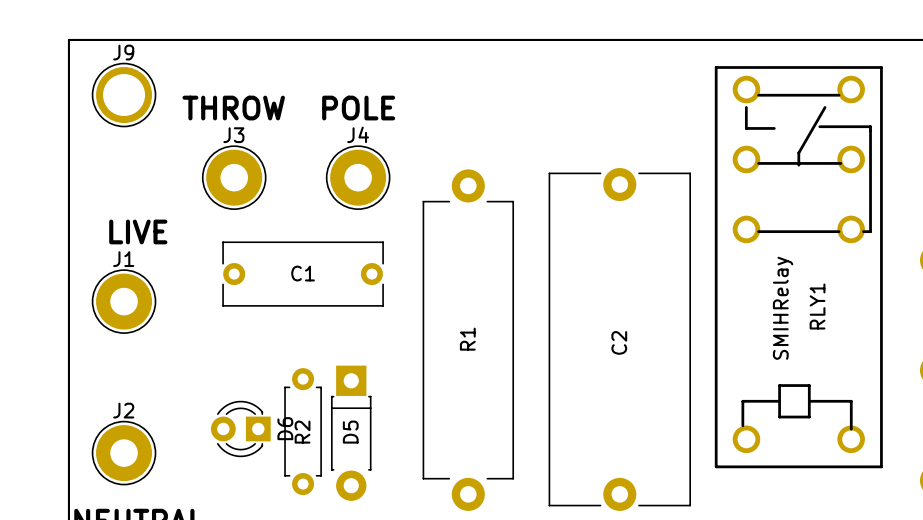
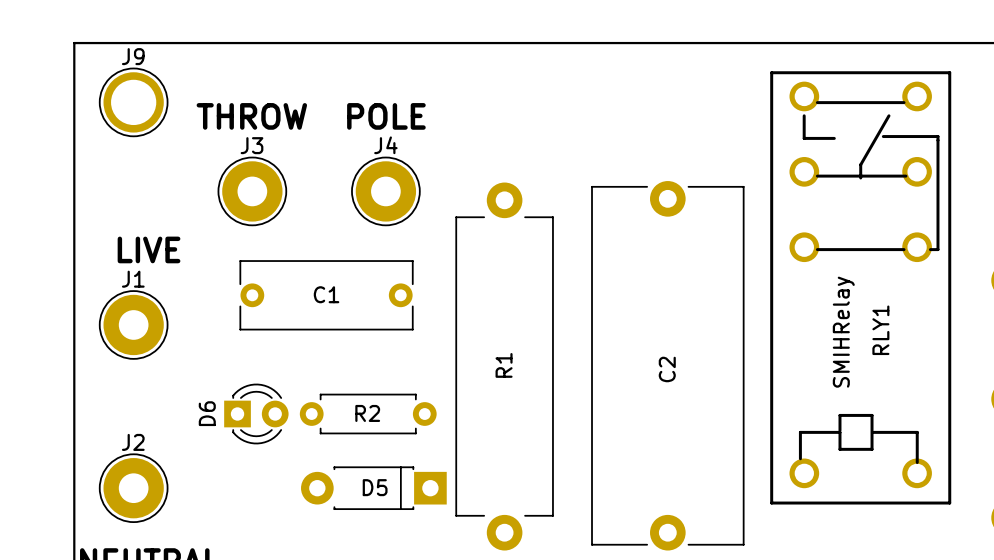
D6 rotation: 0° (240, 428) -> 180° (256, 414)
D6 position: (240, 428) -> (256, 414)
R2 rotation: 0° (303, 431) -> 90° clockwise (368, 414)
D5 rotation: 0° (351, 433) -> 90° clockwise (373, 488)

